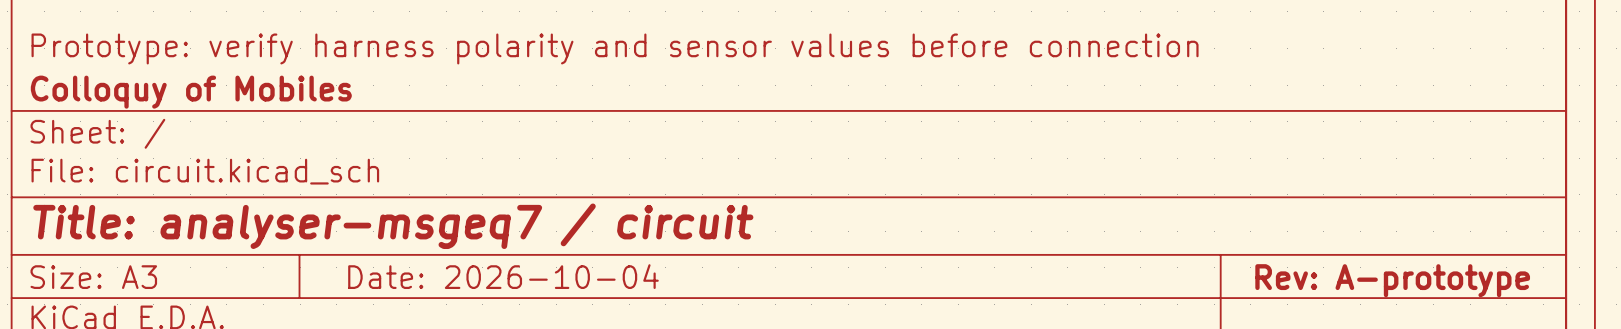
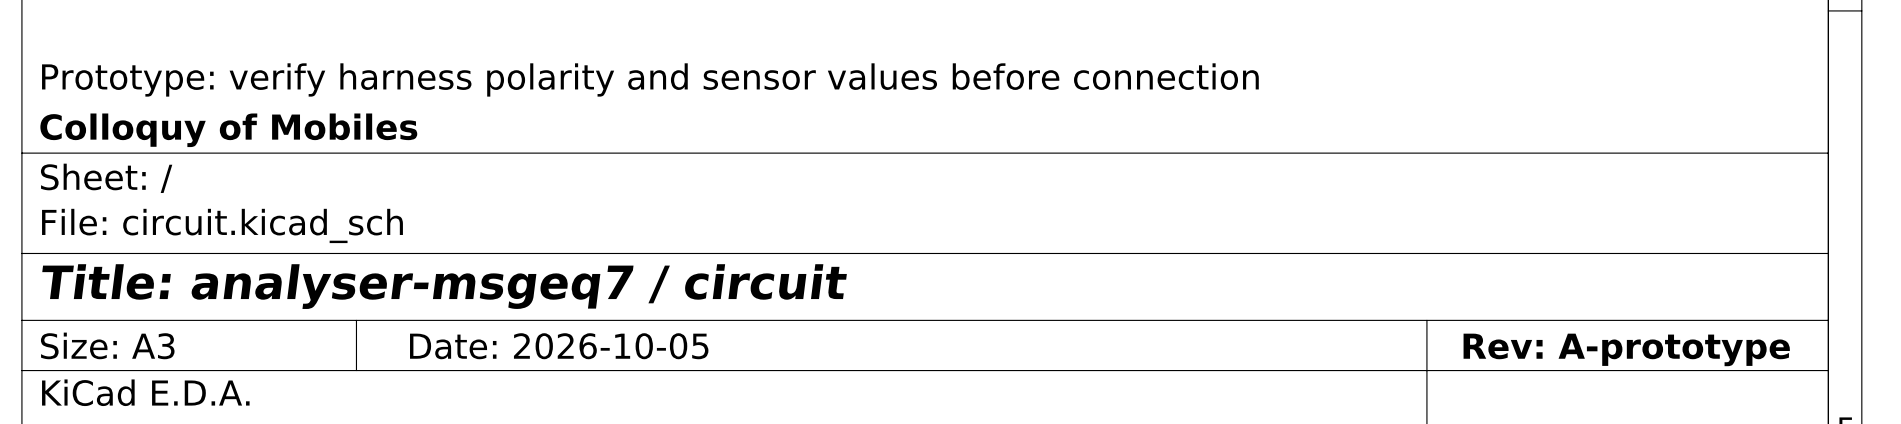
title block: Date: 2026-10-04 (503, 276) -> Date: 2026-10-05 (559, 346)

